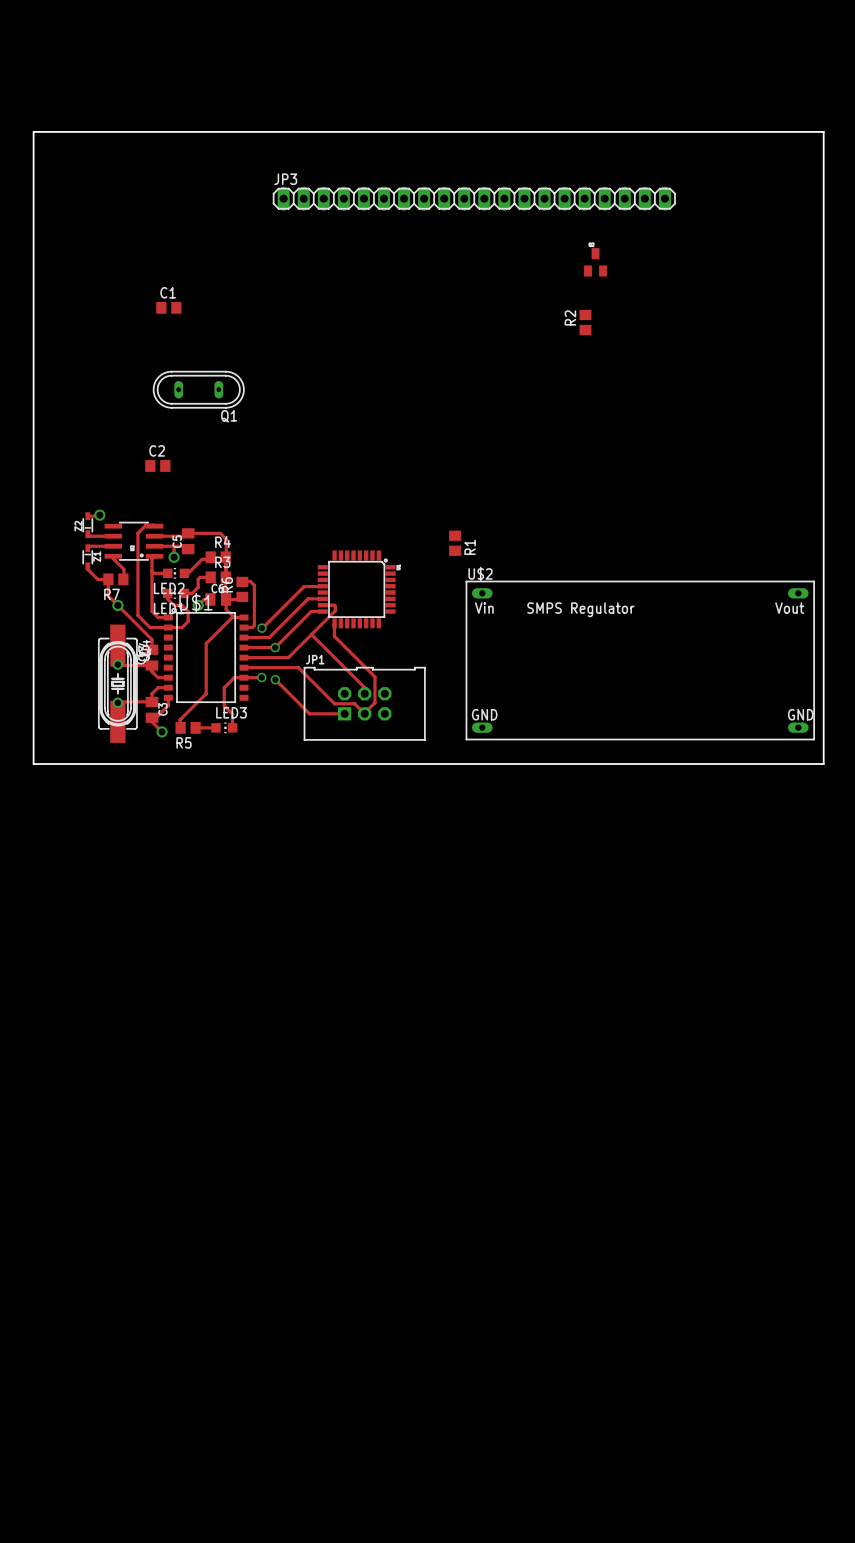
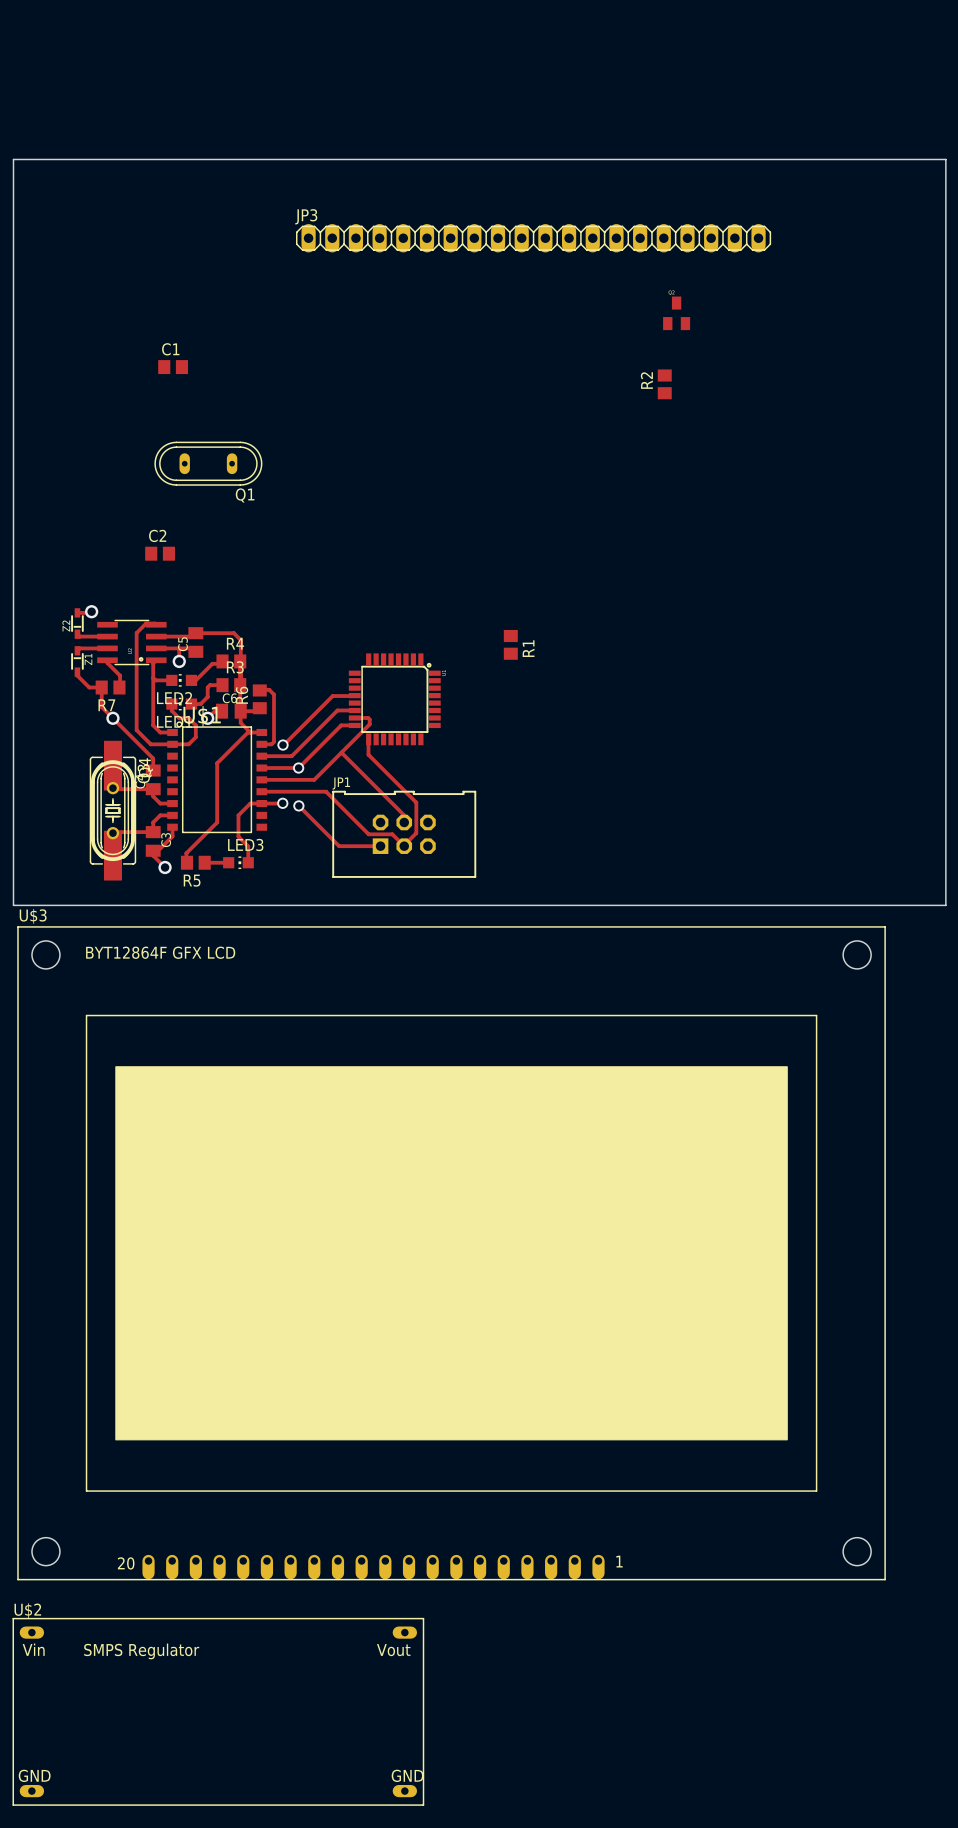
U$2 position: (640, 660) -> (218, 1711)
U$3: none -> (451, 1253)

